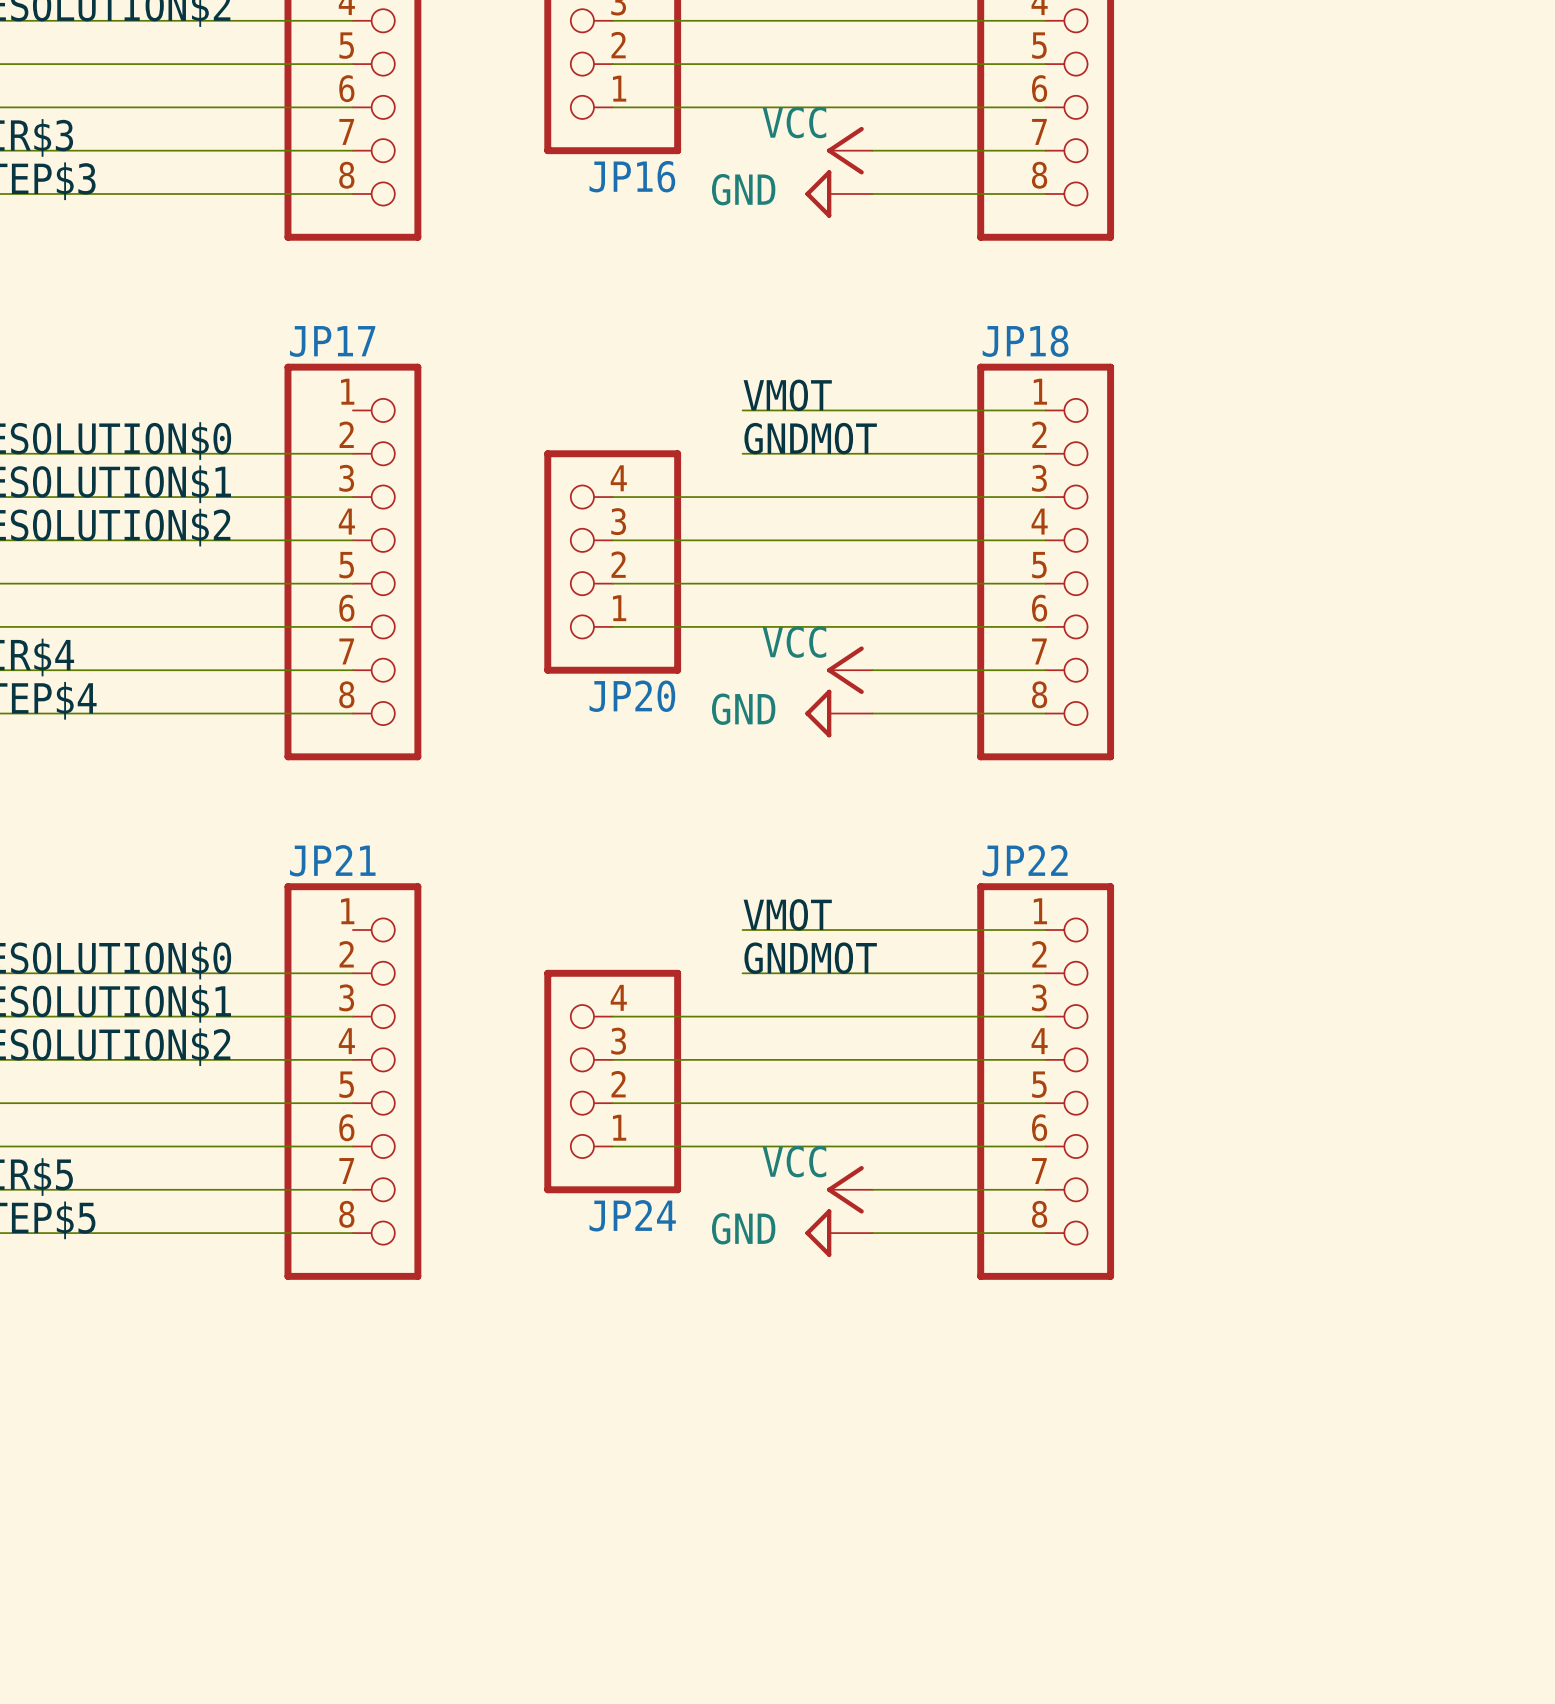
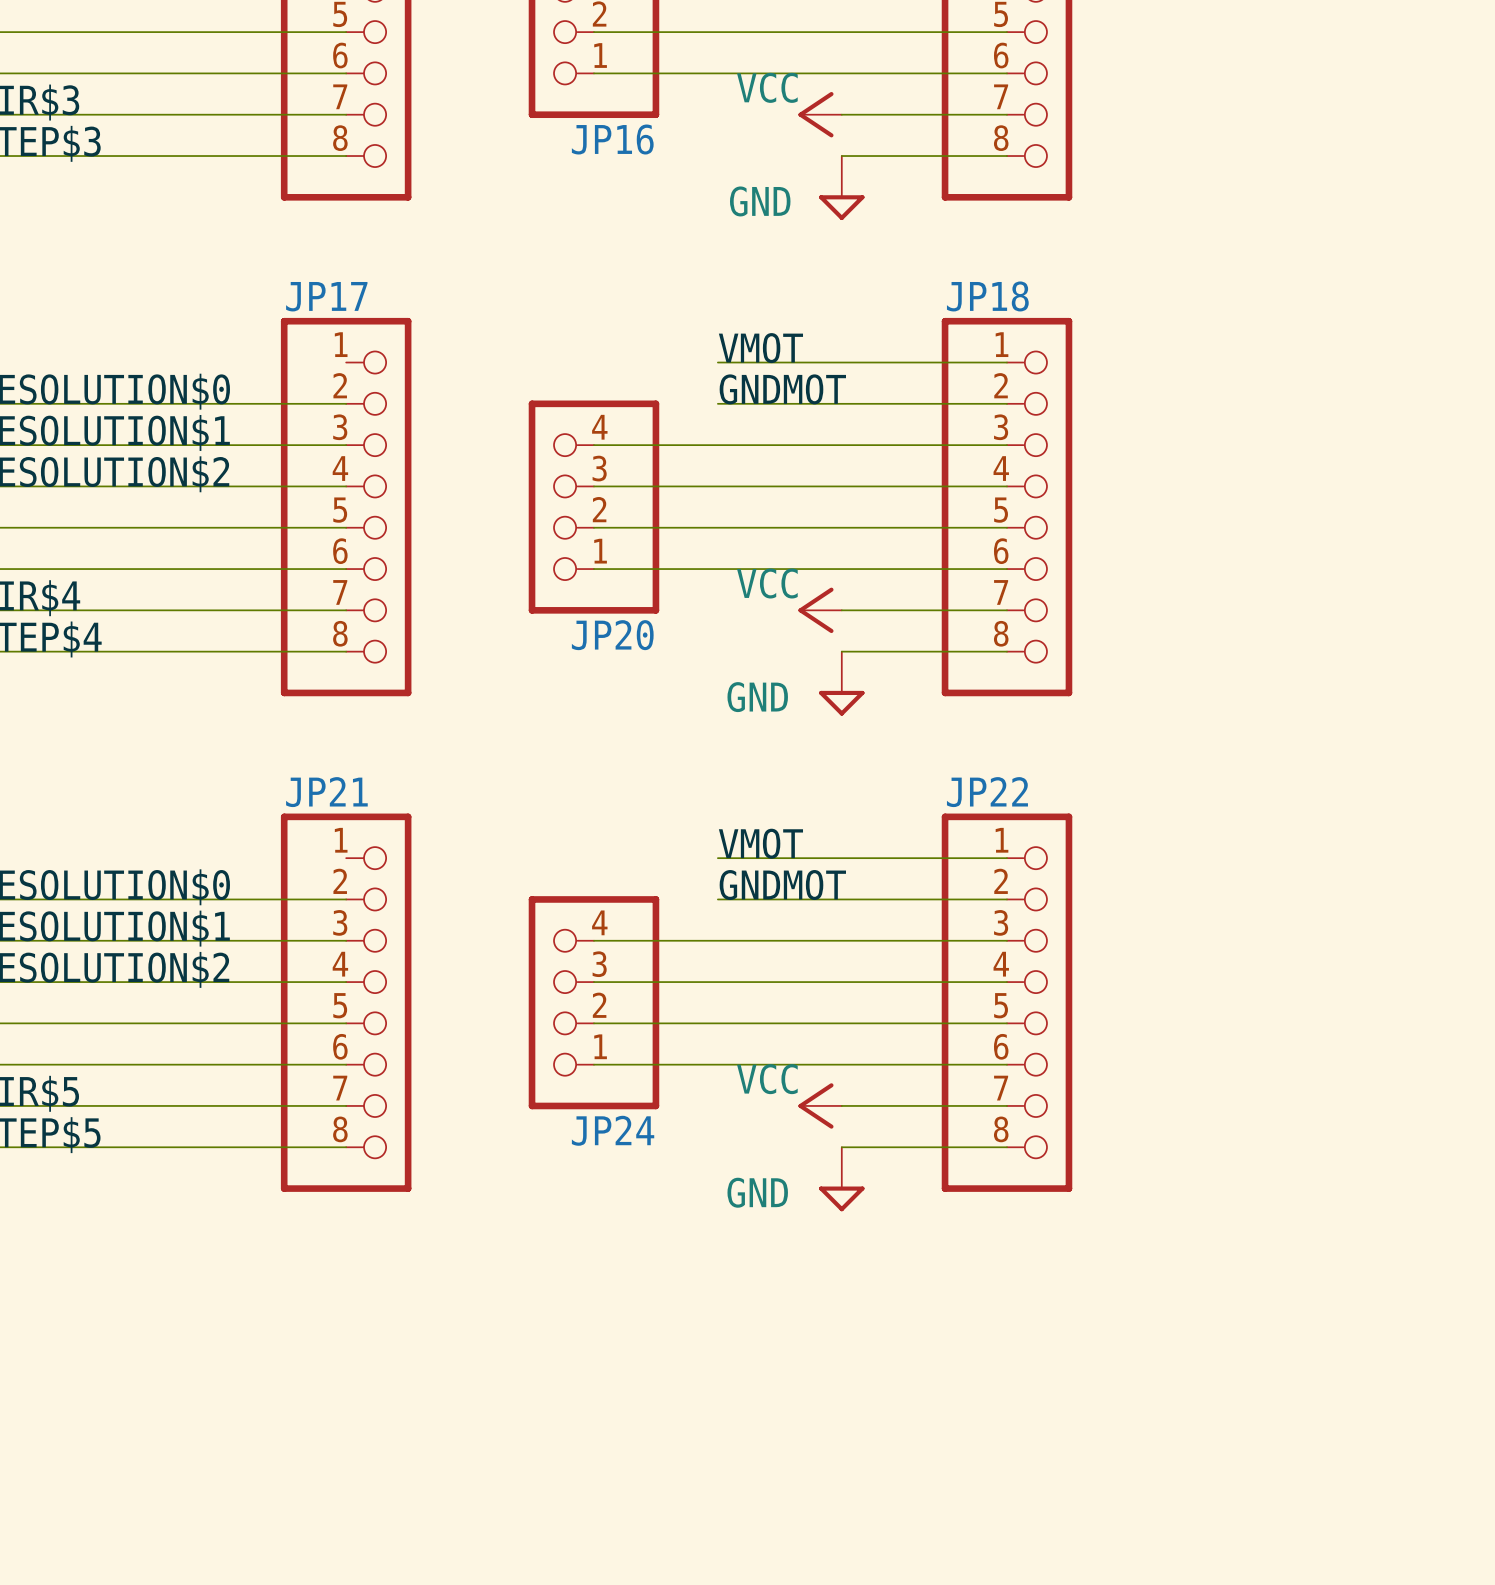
power symbol rotation: 0° (818, 193) -> 90° counterclockwise (841, 207)
power symbol position: GND (838, 193) -> GND (841, 188)
power symbol text position: GND (743, 709) -> GND (757, 697)
power symbol rotation: 0° (818, 713) -> 90° counterclockwise (841, 703)
power symbol position: GND (838, 713) -> GND (841, 683)
power symbol text position: GND (743, 1228) -> GND (757, 1192)
power symbol rotation: 0° (818, 1233) -> 90° counterclockwise (841, 1198)
power symbol position: GND (838, 1233) -> GND (841, 1179)

